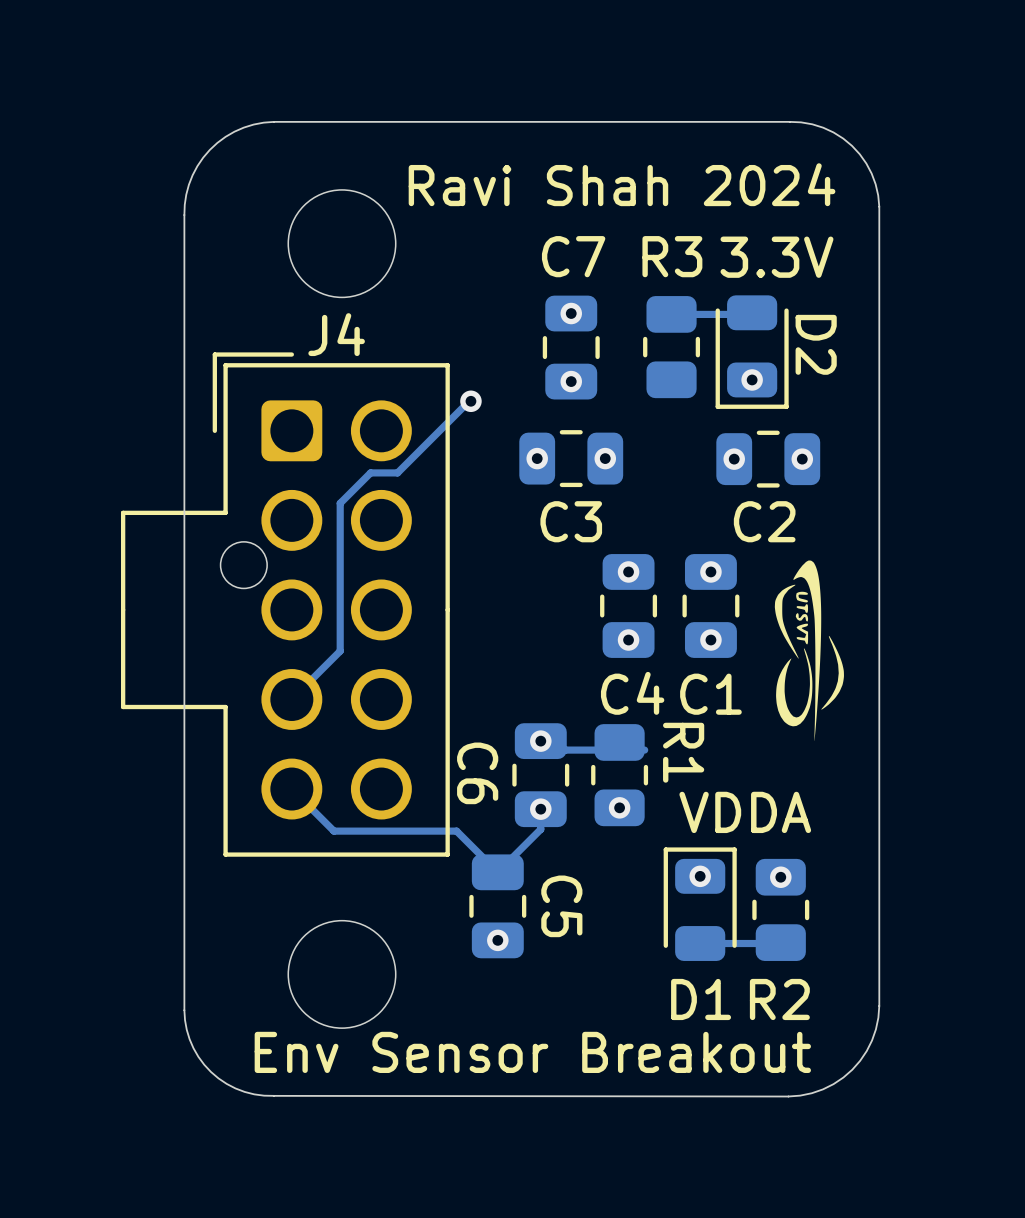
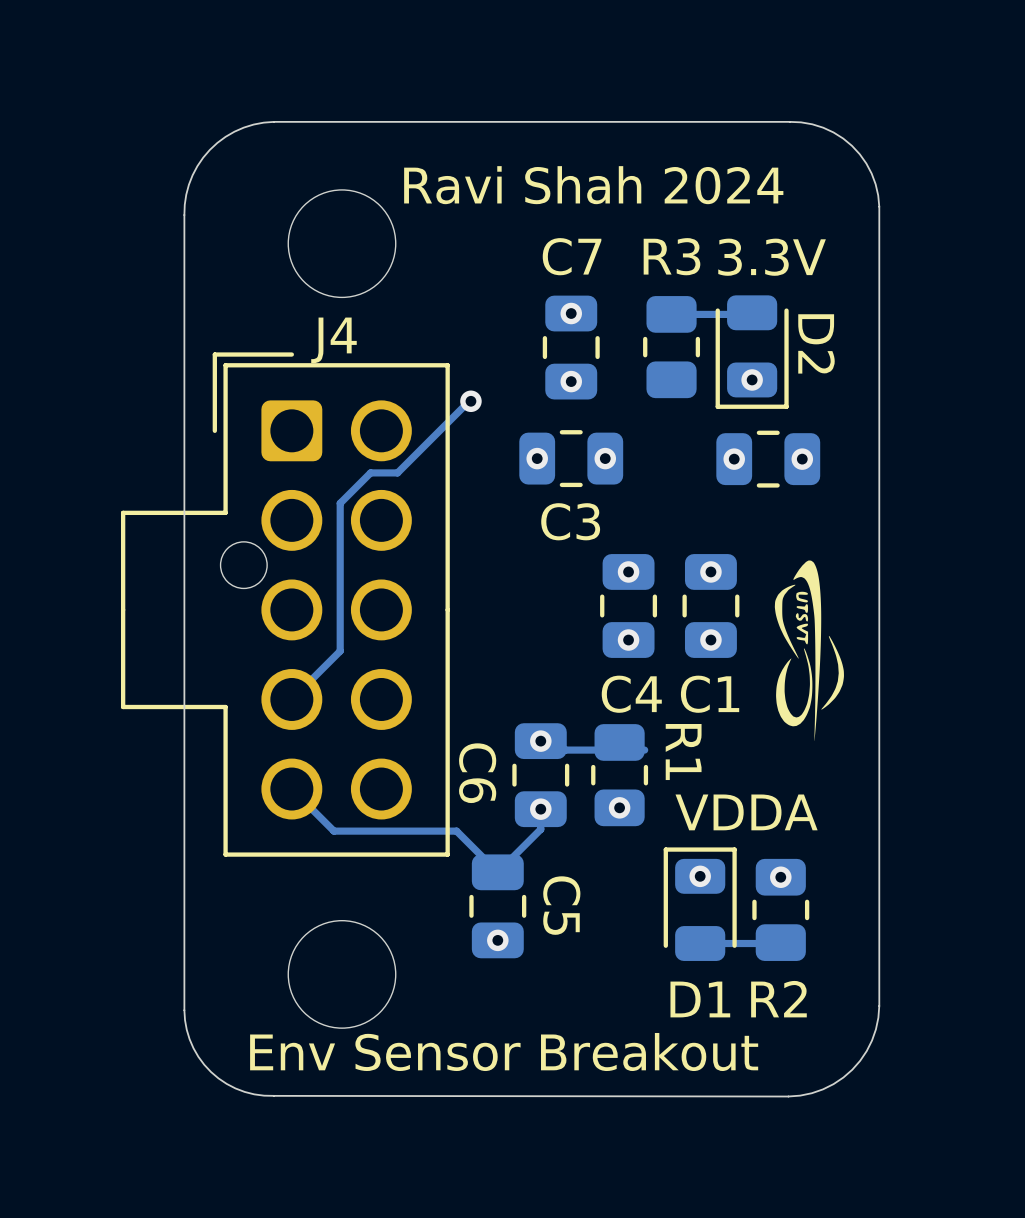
C2 name: C2 (764, 521) -> none

